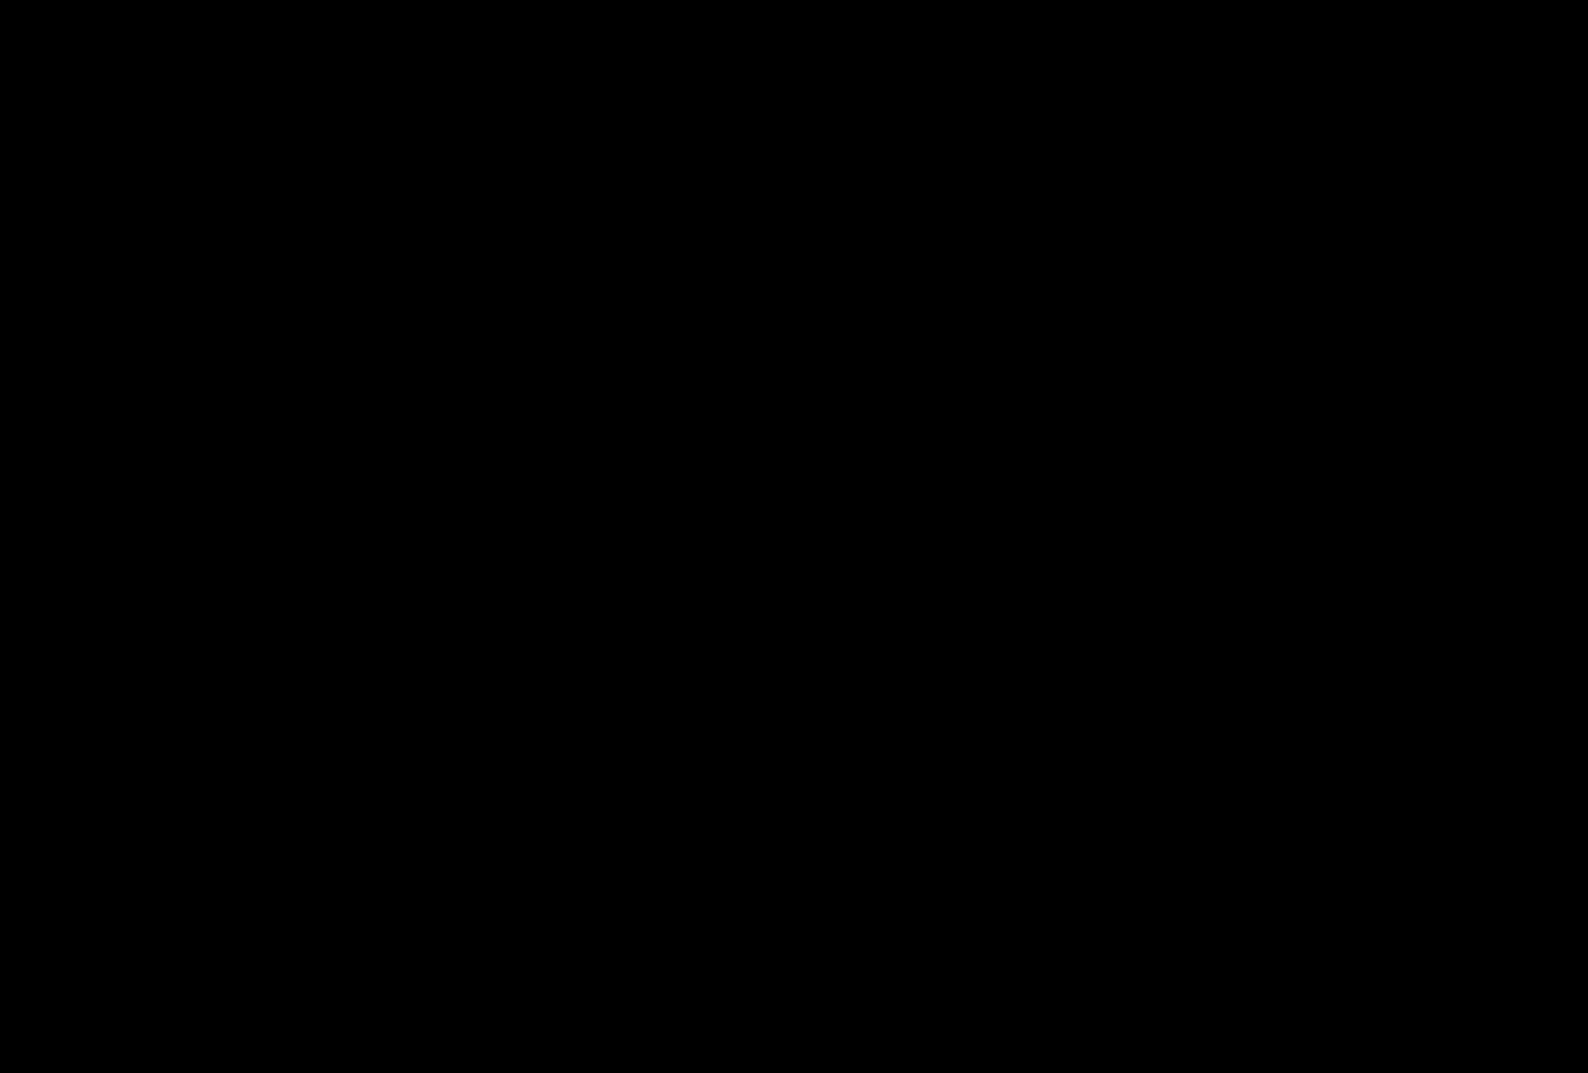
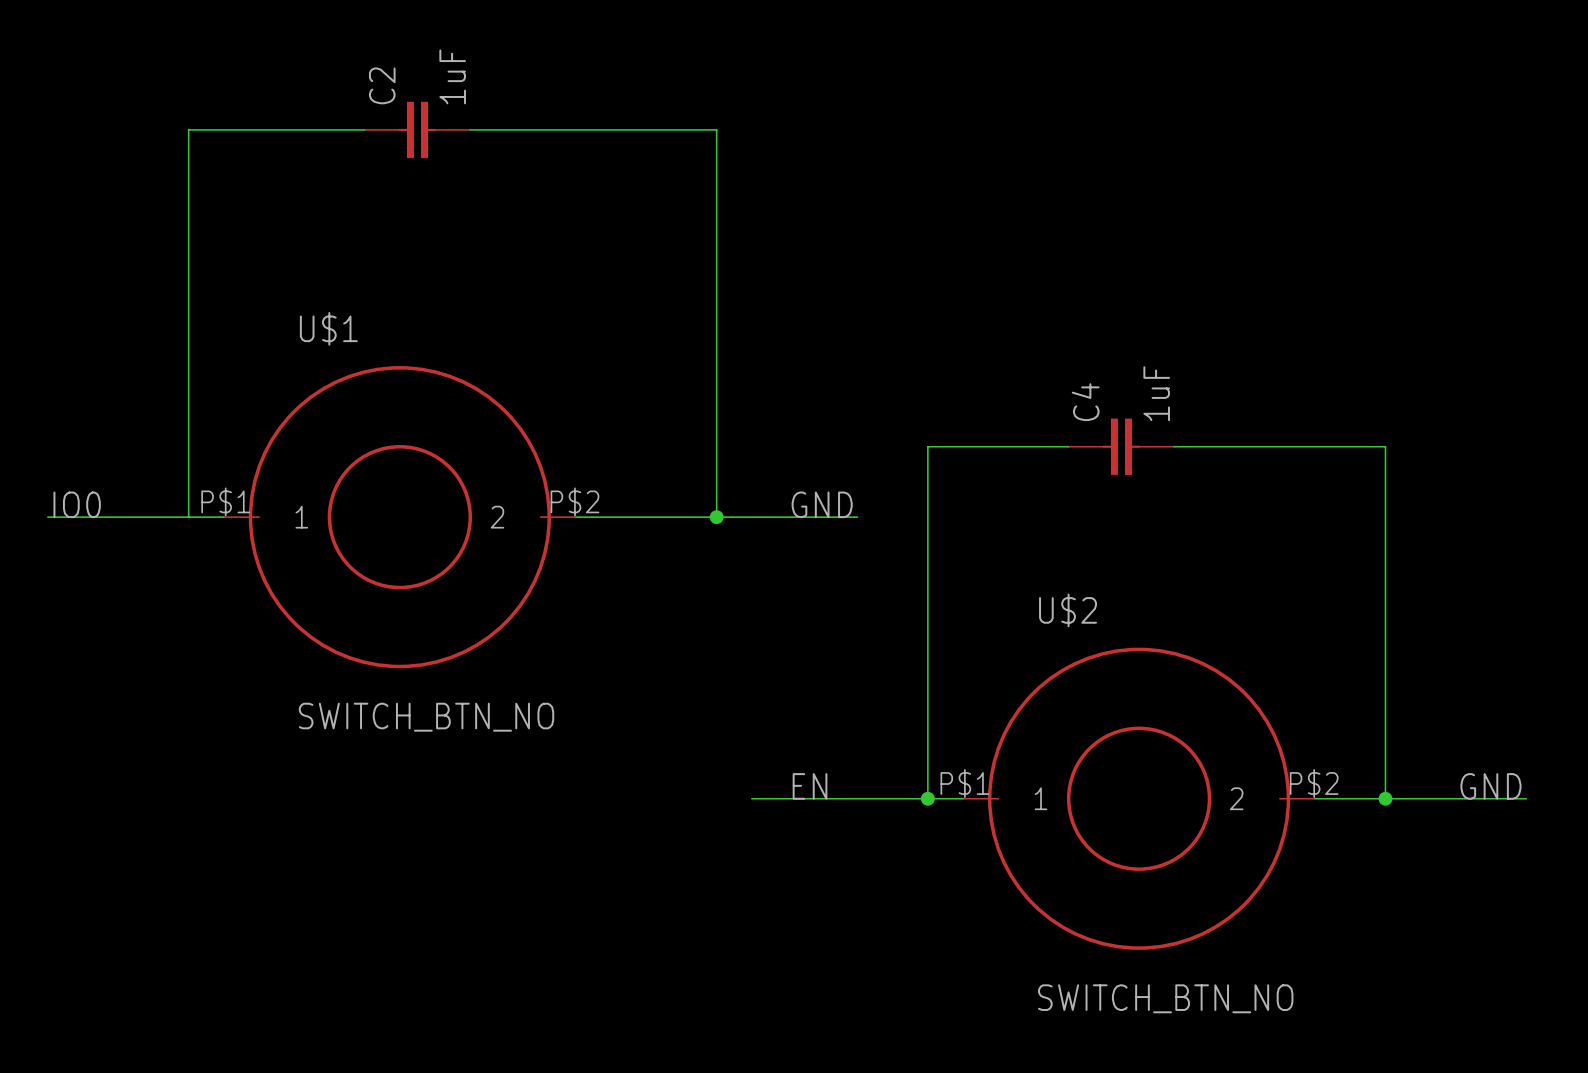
wire: none -> (364, 129) (188, 129) (188, 517)
C2: none -> 1uF (417, 129)
wire: none -> (470, 129) (716, 129) (716, 517)
wire: none -> (1068, 446) (927, 446) (927, 798)
C4: none -> 1uF (1121, 446)
wire: none -> (1174, 446) (1385, 446) (1385, 798)
label: none -> IO0 (77, 504)
label: none -> GND (822, 504)
wire: none -> (47, 517) (223, 517)
U$1: none -> SWITCH_BTN_NO (399, 517)
wire: none -> (575, 517) (857, 517)
junction: none -> (716, 517)
label: none -> EN (810, 786)
label: none -> GND (1490, 786)
wire: none -> (751, 798) (963, 798)
junction: none -> (927, 798)
U$2: none -> SWITCH_BTN_NO (1139, 798)
wire: none -> (1315, 798) (1526, 798)
junction: none -> (1385, 798)

